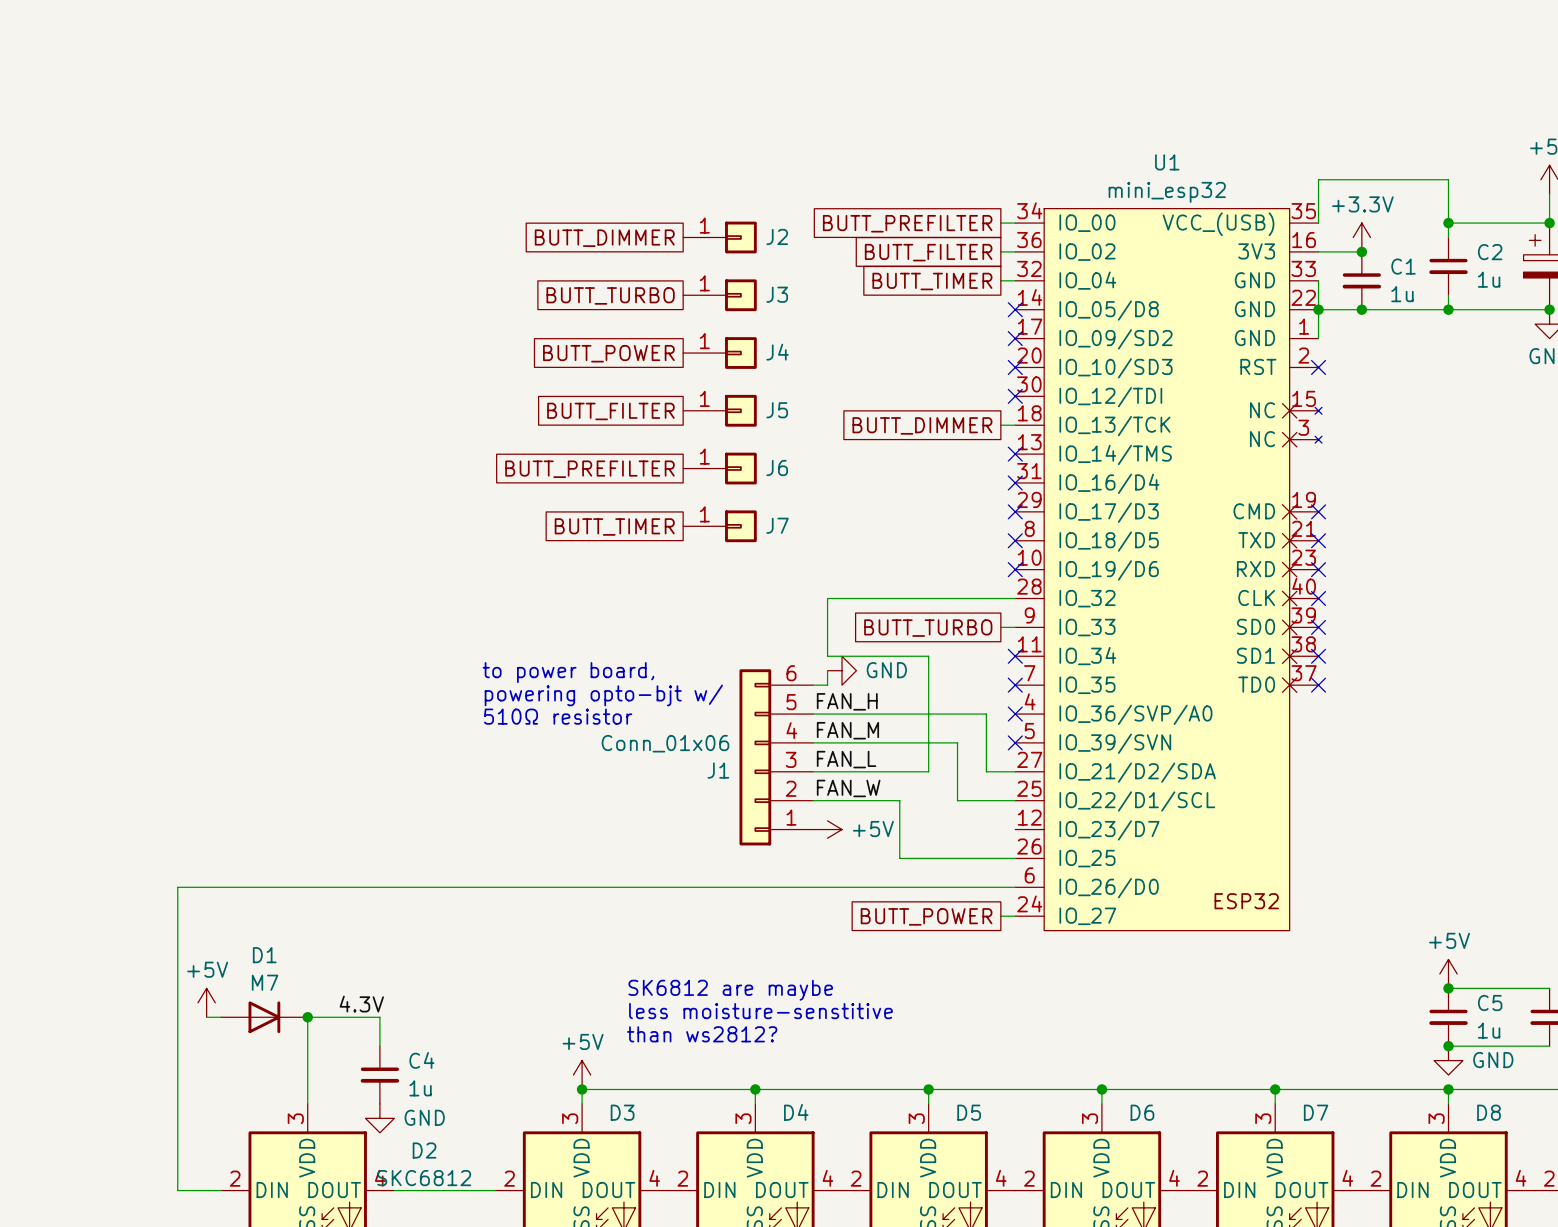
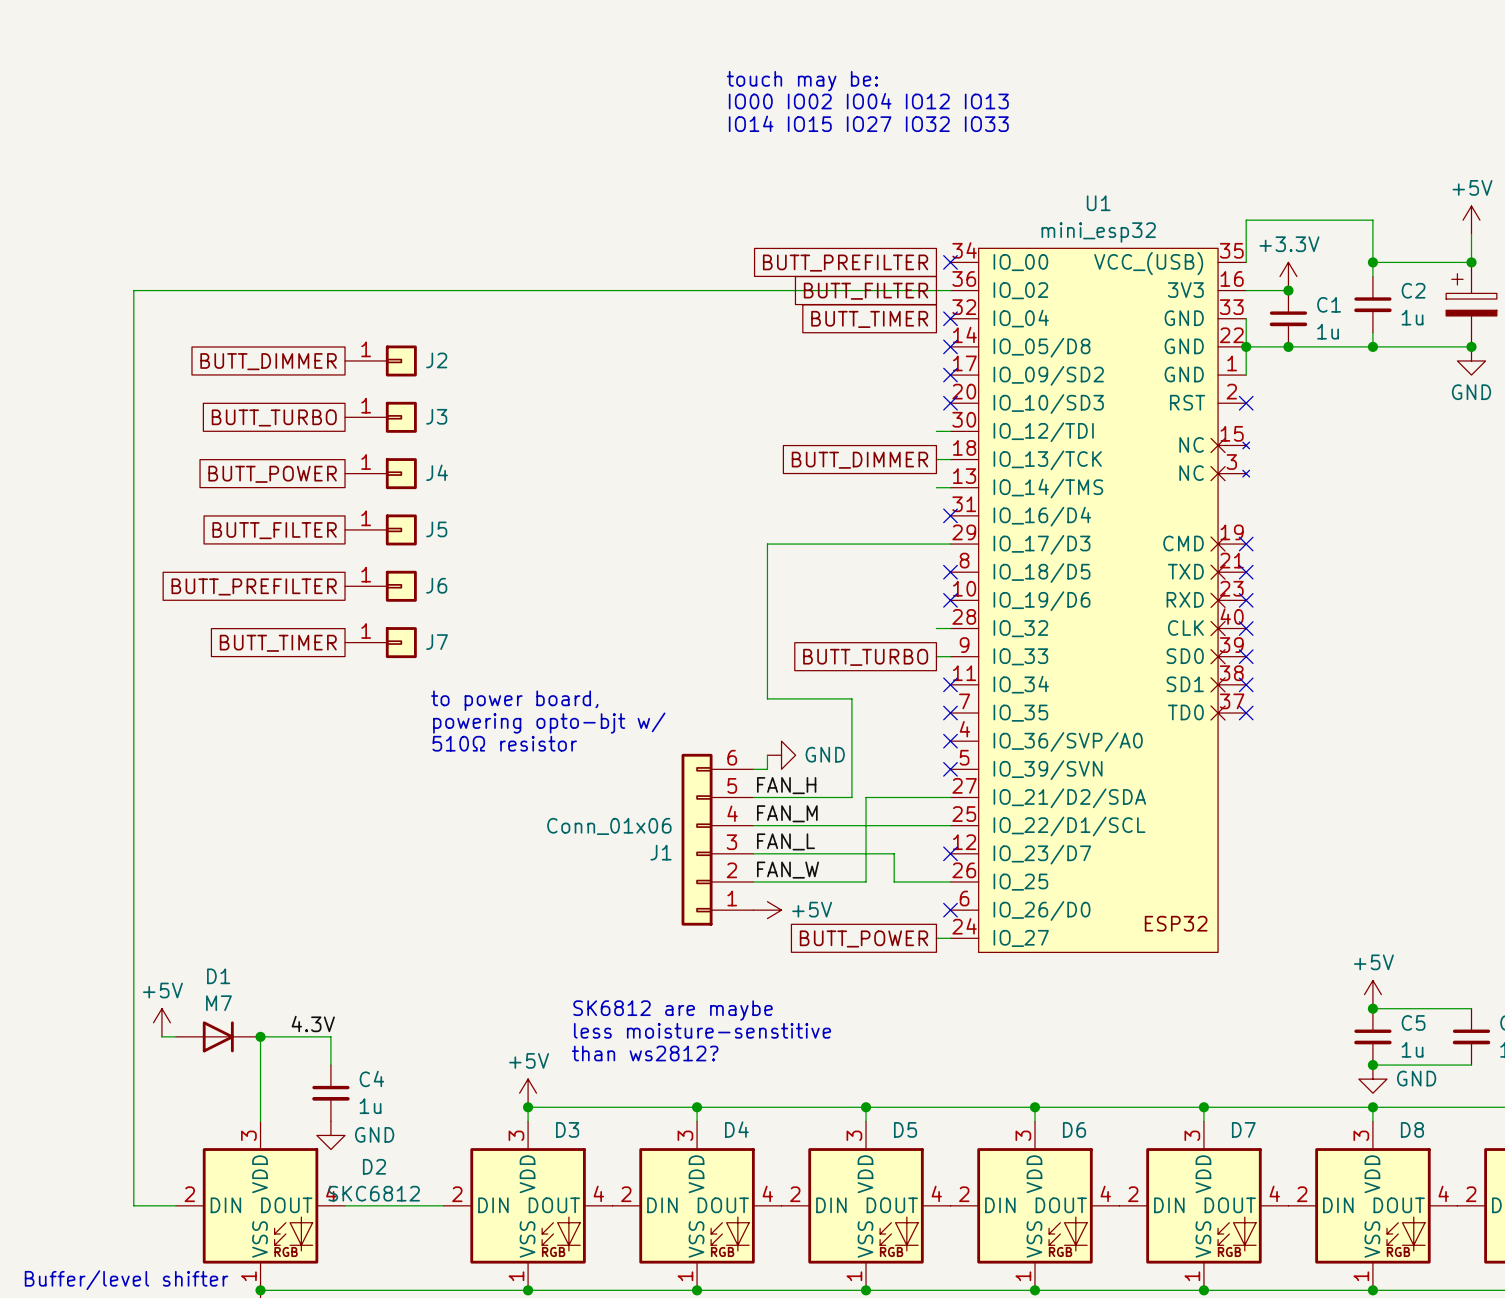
text: none -> touch may be: (802, 81)
text: none -> IO00 IO02 IO04 IO12 IO13 (868, 101)
text: none -> IO14 IO15 IO27 IO32 IO33 (868, 123)
wire: (1000, 223) (1015, 223) -> (936, 431) (950, 431)
no-connect mark: none -> (950, 262)
J2 position: (719, 237) -> (380, 360)
global label: BUTT_DIMMER (604, 238) -> none
wire: (1000, 280) (1015, 280) -> (936, 487) (950, 487)
no-connect mark: none -> (950, 318)
global label: BUTT_TURBO (610, 295) -> none
J3 position: (719, 295) -> (380, 417)
global label: none -> BUTT_DIMMER (268, 361)
global label: BUTT_POWER (608, 353) -> none
J4 position: (719, 353) -> (380, 473)
global label: none -> BUTT_TURBO (274, 417)
no-connect mark: (1015, 396) -> none
J5 position: (719, 410) -> (380, 529)
global label: BUTT_FILTER (610, 411) -> none
global label: none -> BUTT_POWER (272, 474)
no-connect mark: (1015, 454) -> none
J6 position: (719, 468) -> (380, 586)
global label: BUTT_PREFILTER (589, 469) -> none
global label: none -> BUTT_FILTER (274, 530)
no-connect mark: (1015, 511) -> none
global label: BUTT_TIMER (614, 526) -> none
J7 position: (719, 526) -> (380, 642)
global label: none -> BUTT_PREFILTER (254, 586)
wire: (827, 598) (1000, 598) -> (767, 628) (767, 544) (950, 544)
global label: none -> BUTT_TIMER (278, 643)
wire: (827, 656) (928, 656) (928, 771) (914, 771) -> (767, 684) (767, 698) (851, 698) (851, 797)
wire: (827, 670) (827, 685) (813, 685) -> none
power symbol position: GND (842, 670) -> GND (781, 755)
label: FAN_H (847, 701) -> none
wire: (813, 714) (986, 714) (986, 771) -> none
label: FAN_M (847, 730) -> none
wire: (827, 742) (957, 742) (957, 800) -> (767, 769) (767, 755)
J1 position: (776, 757) -> (717, 839)
label: FAN_L (846, 759) -> FAN_H (786, 785)
label: FAN_W (848, 788) -> FAN_M (787, 813)
wire: (899, 800) (899, 858) -> (837, 825) (894, 825)
label: none -> FAN_L (785, 841)
wire: none -> (753, 853) (894, 853) (894, 881)
power symbol position: +5V (827, 829) -> +5V (767, 910)
no-connect mark: none -> (950, 853)
label: none -> FAN_W (788, 870)
wire: none -> (753, 881) (837, 881)
wire: (928, 858) (957, 858) -> (866, 881) (866, 797) (922, 797)
wire: (177, 887) (1015, 887) -> (133, 910) (133, 290) (936, 290)
no-connect mark: none -> (950, 910)

